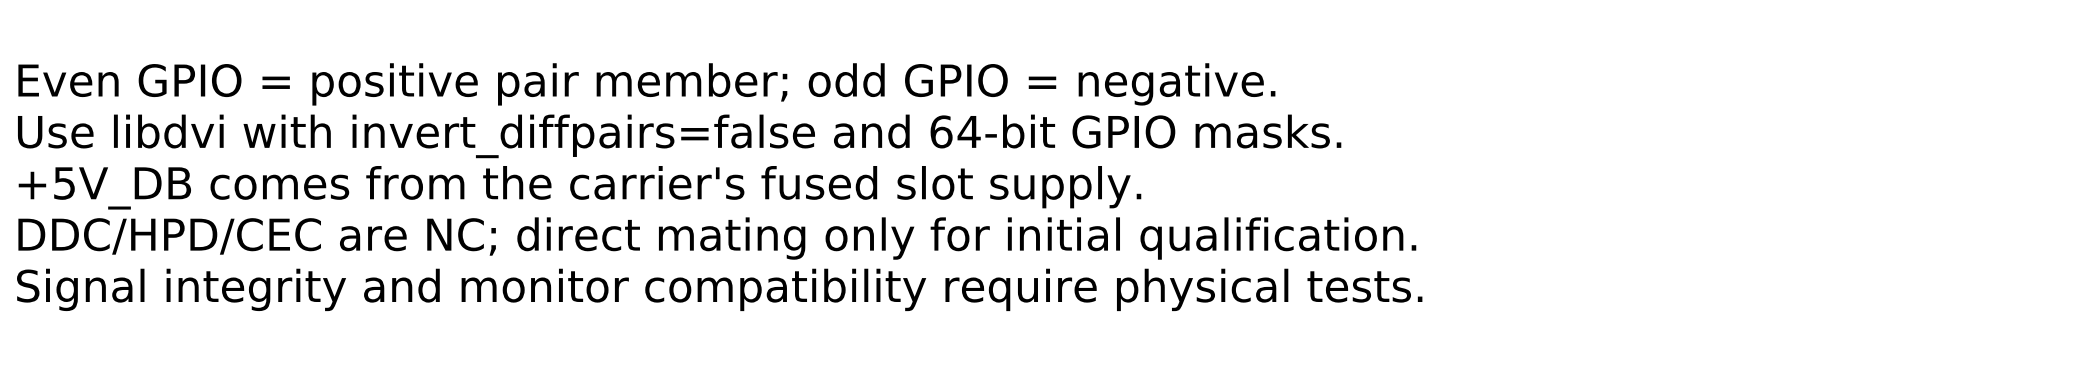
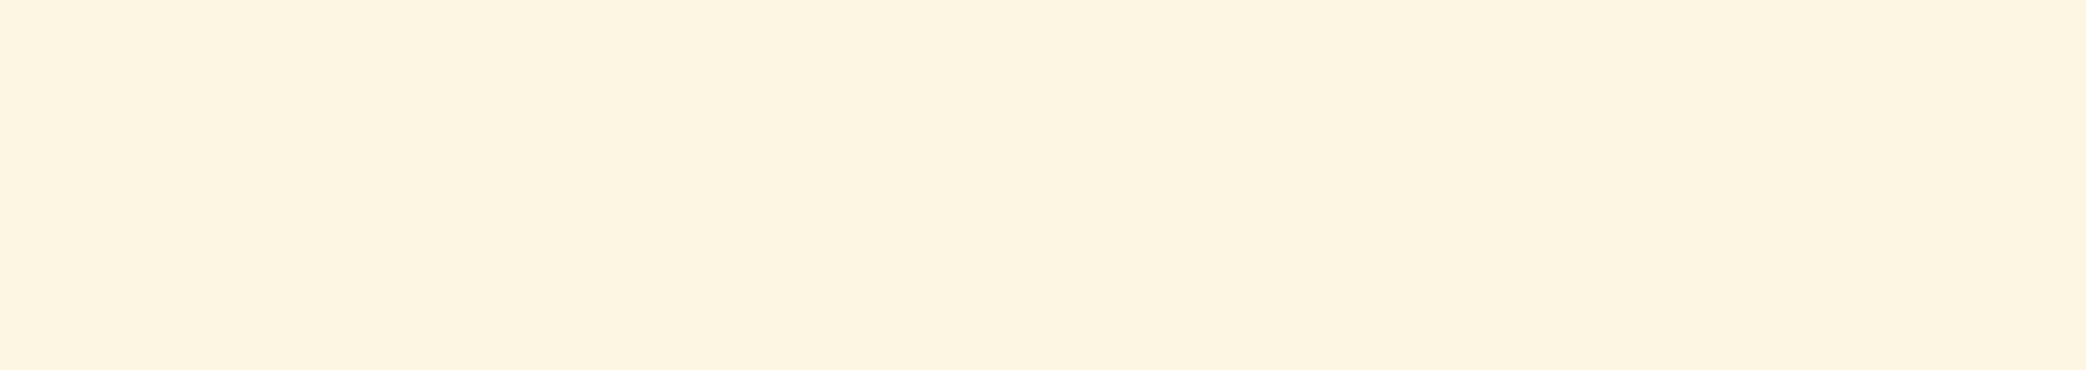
text: Even GPIO = positive pair member; odd GPIO = negative. (646, 84) -> none
text: Use libdvi with invert_diffpairs=false and 64-bit GPIO masks. (679, 136) -> none
text: +5V_DB comes from the carrier's fused slot supply. (579, 187) -> none
text: DDC/HPD/CEC are NC; direct mating only for initial qualification. (717, 238) -> none
text: Signal integrity and monitor compatibility require physical tests. (719, 289) -> none

